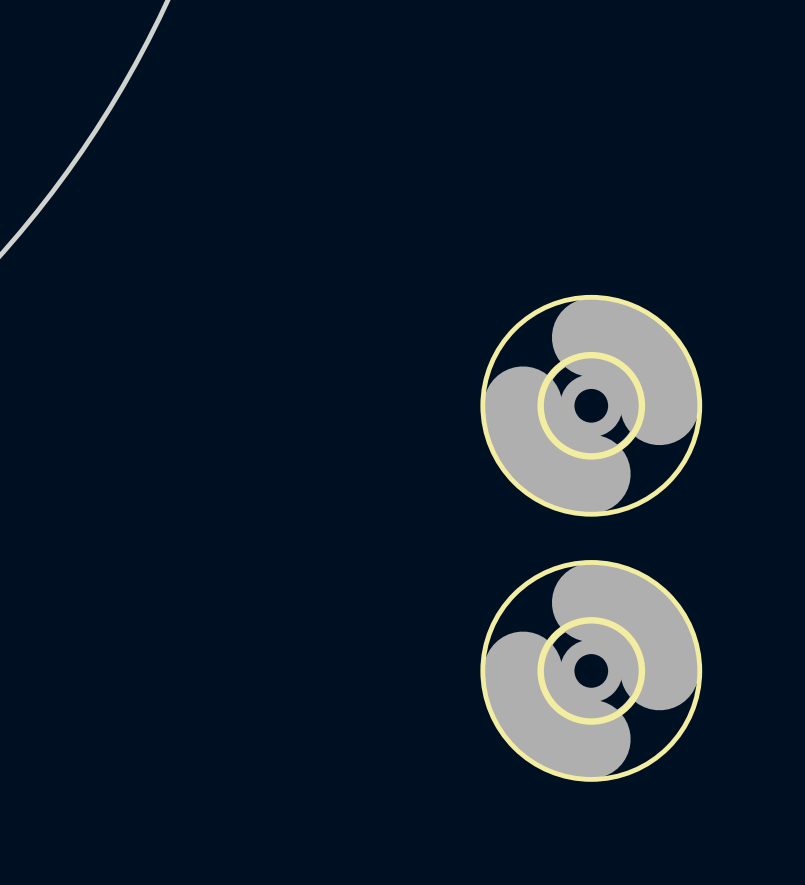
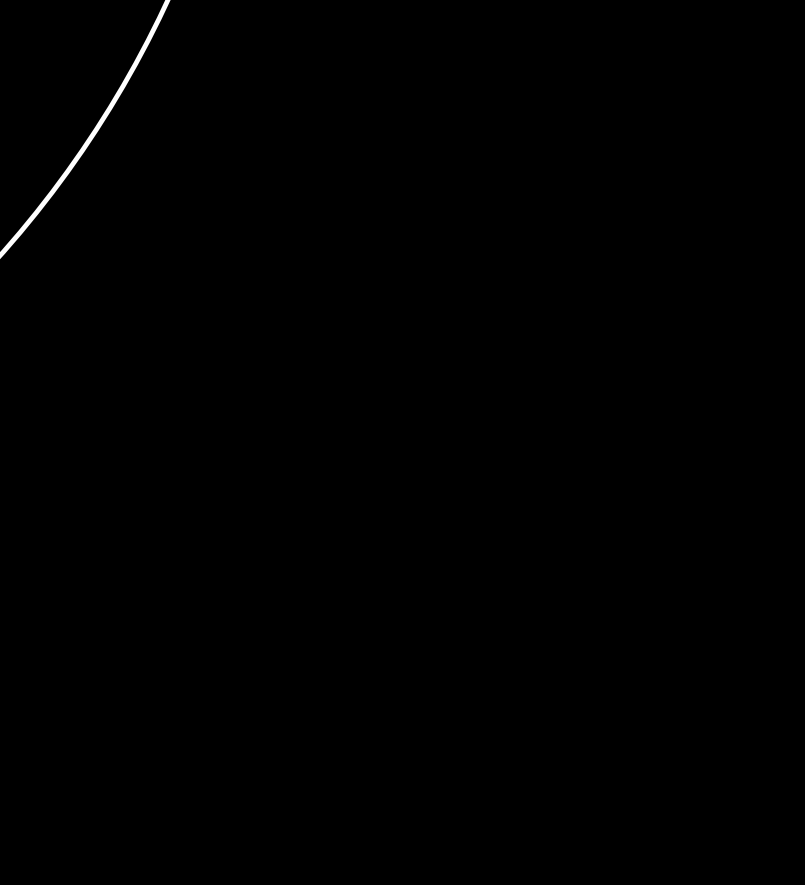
part: (591, 405) -> none
part: (591, 670) -> none

